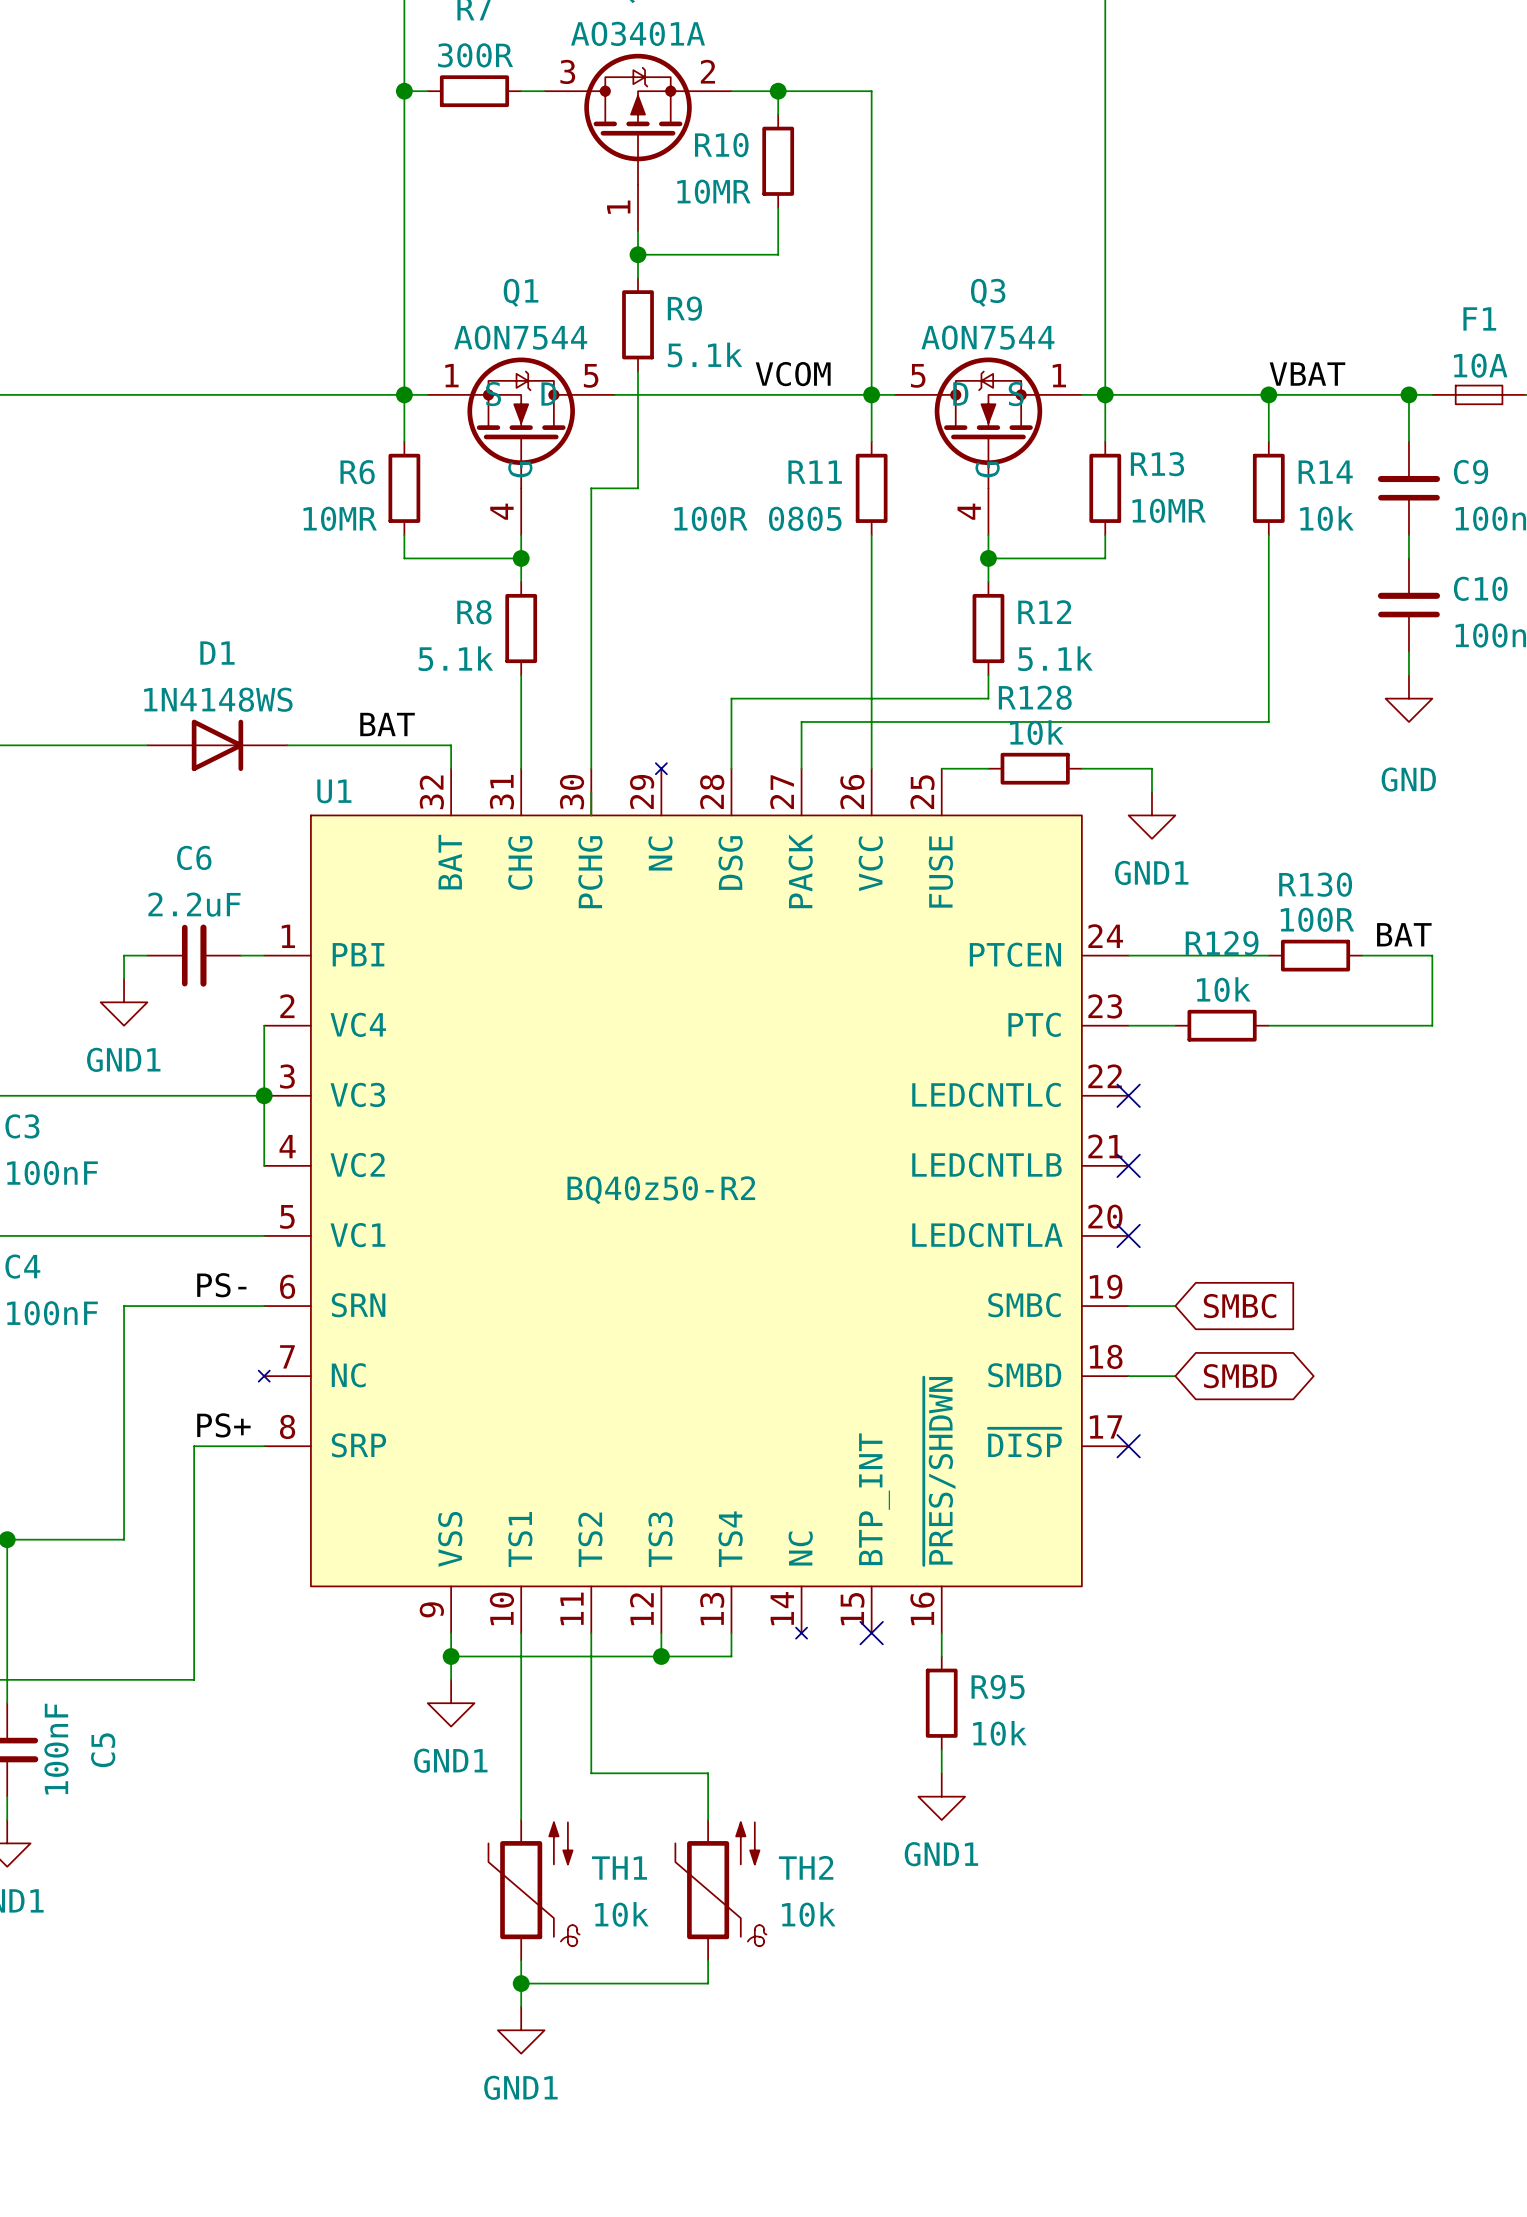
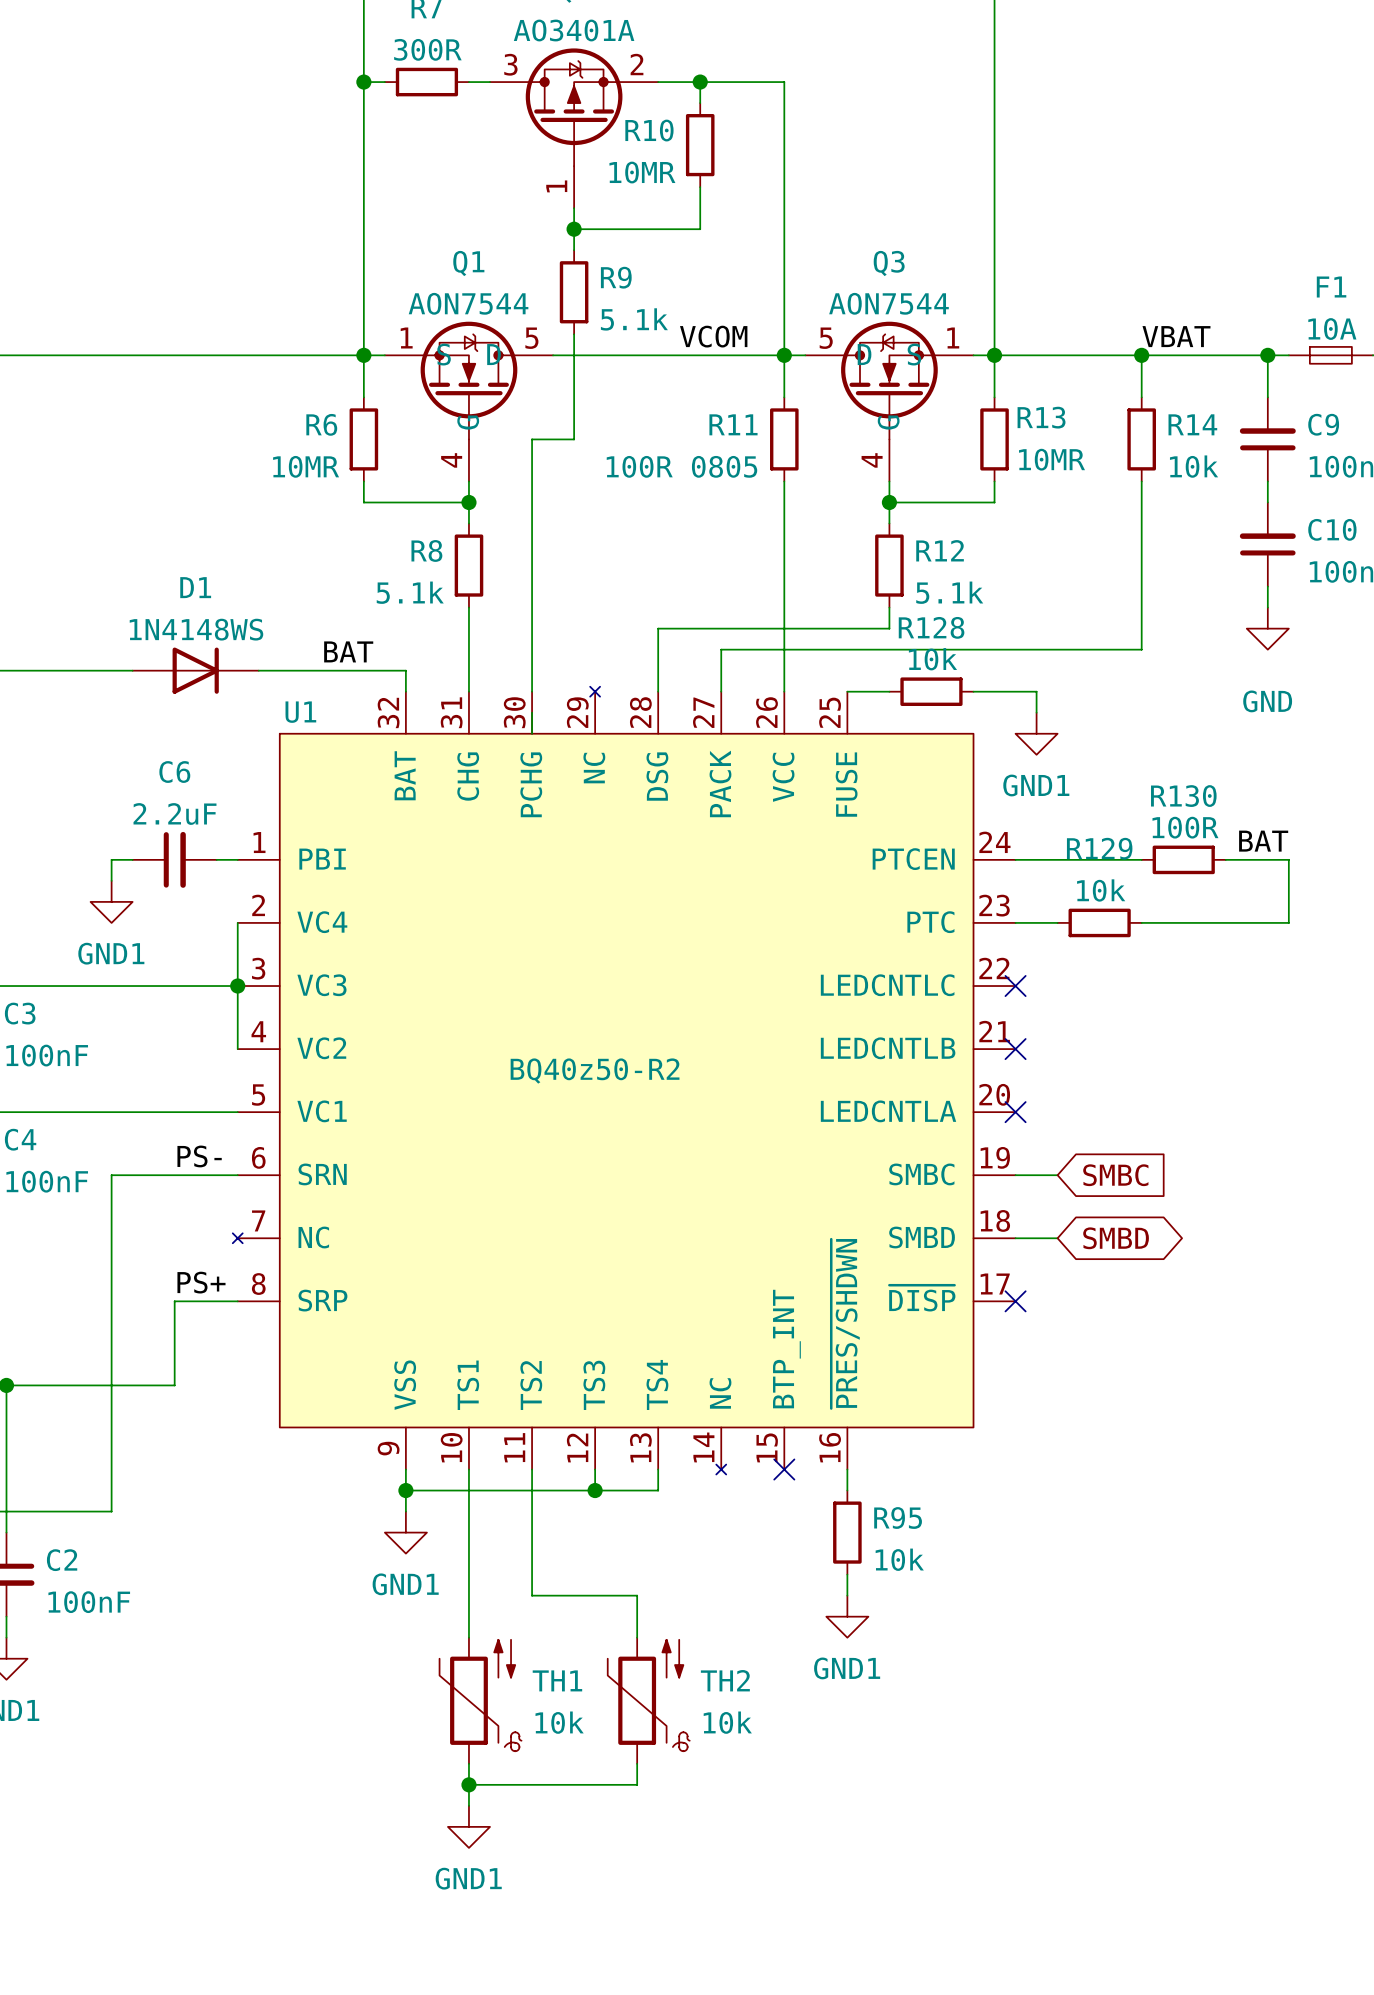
wire: (194, 1539) (194, 1679) (124, 1679) -> (174, 1385) (111, 1385) (111, 1511)
C5 value rotation: 0° (56, 1749) -> 90° clockwise (89, 1602)
C5 name: C5 (103, 1750) -> C2 (62, 1560)

